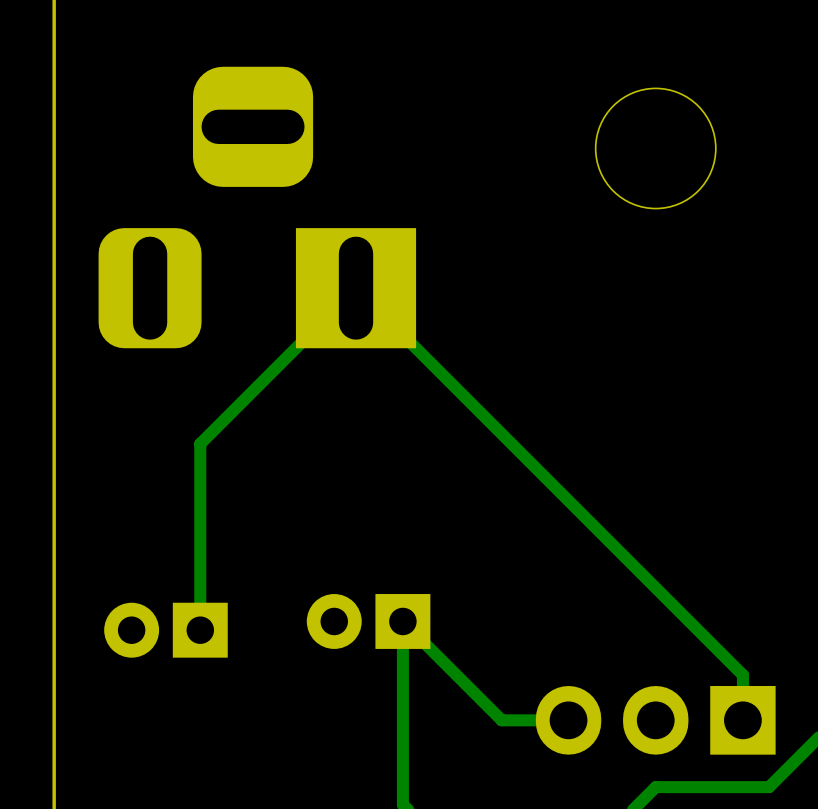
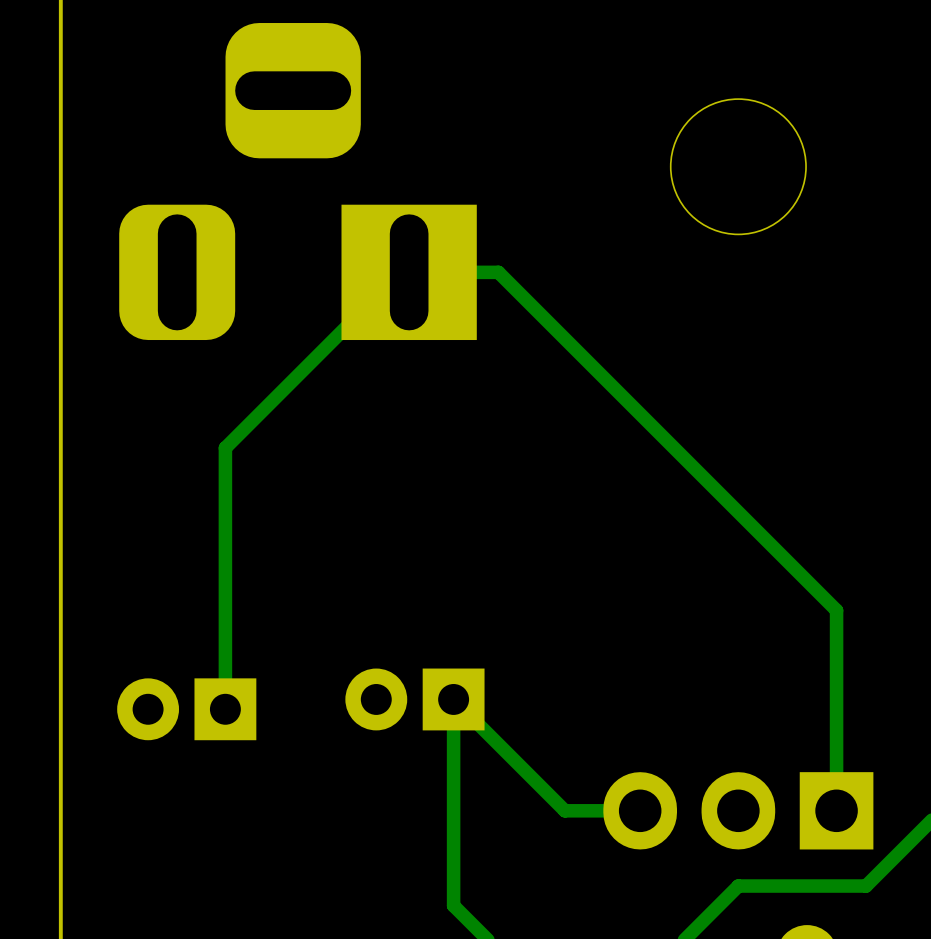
part position: (257, 207) -> (298, 181)
bottom track: (200, 443) (356, 288) (742, 675) -> (225, 499) (225, 447) (401, 272) (498, 272) (836, 610) (836, 759)

